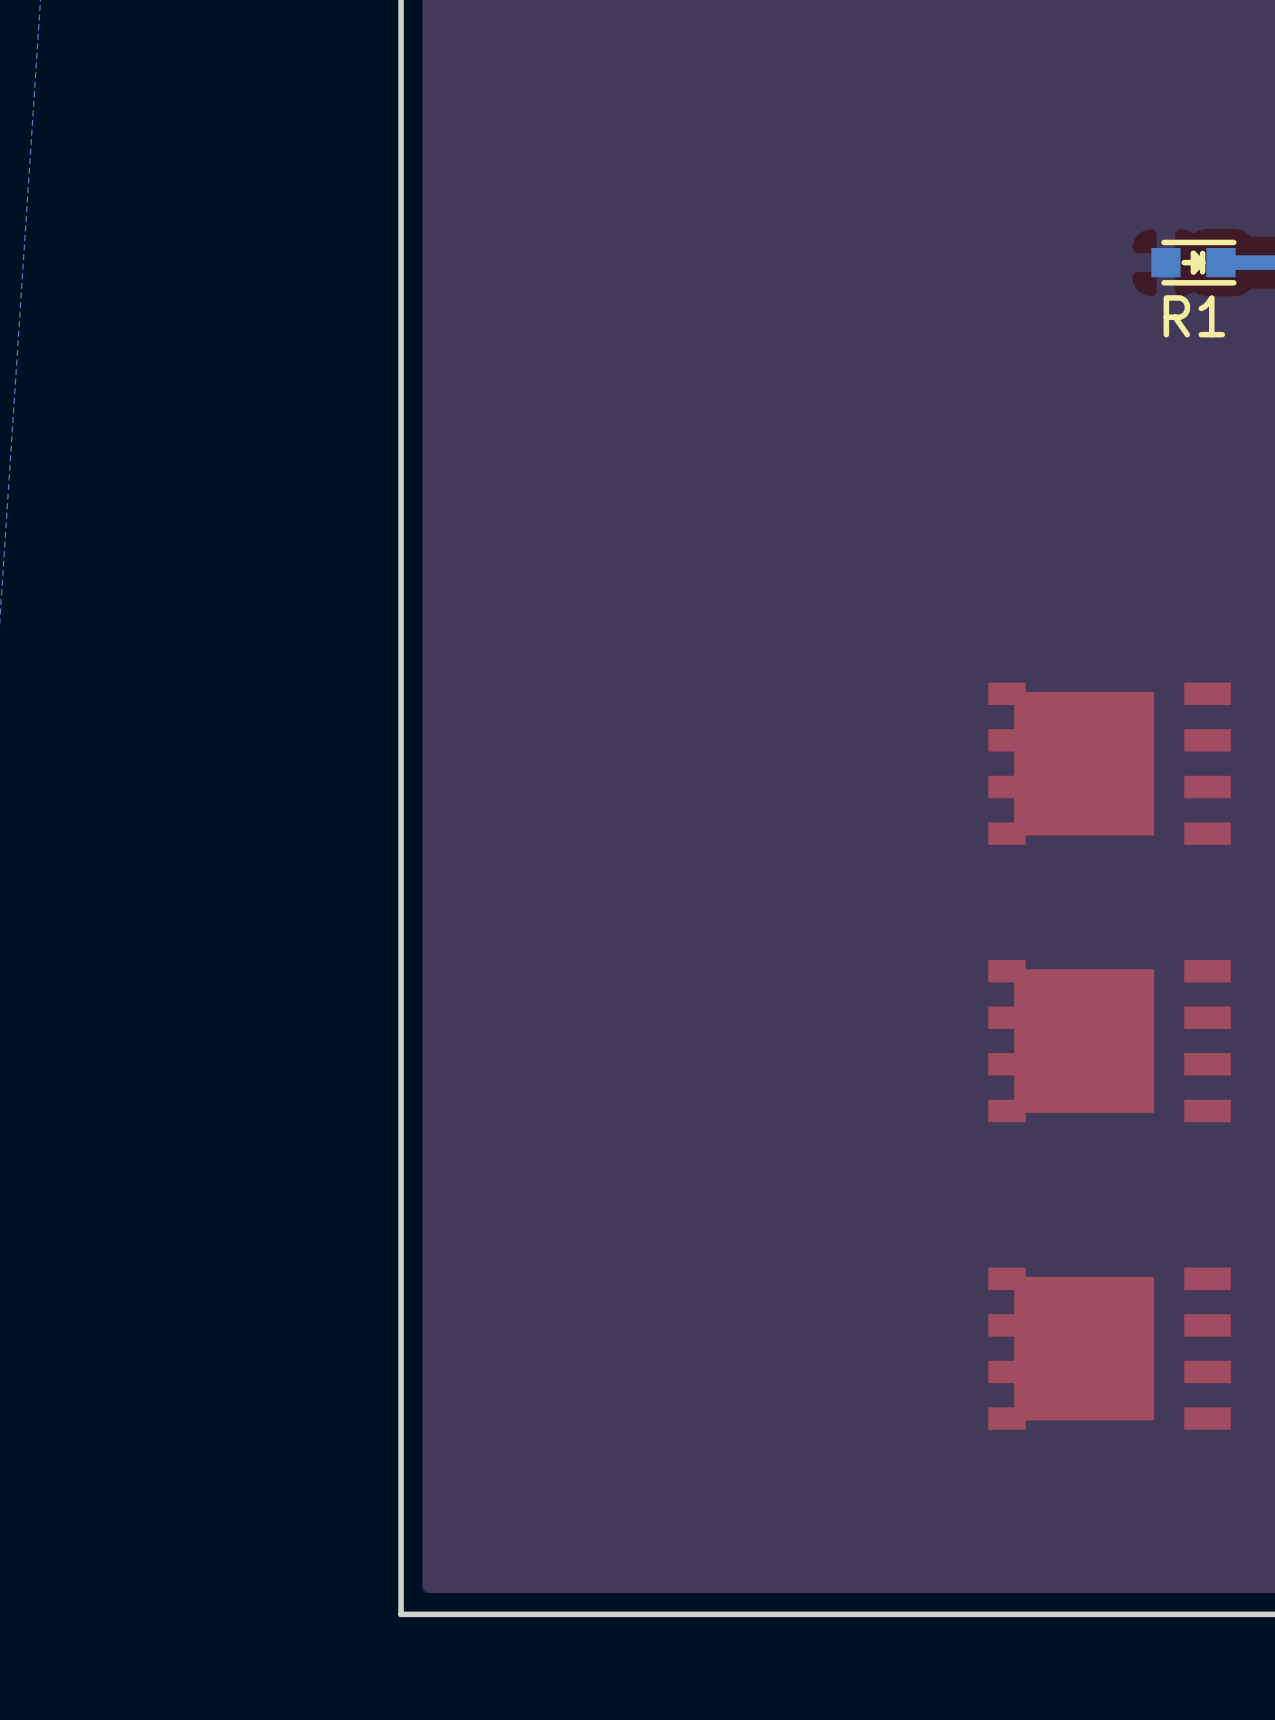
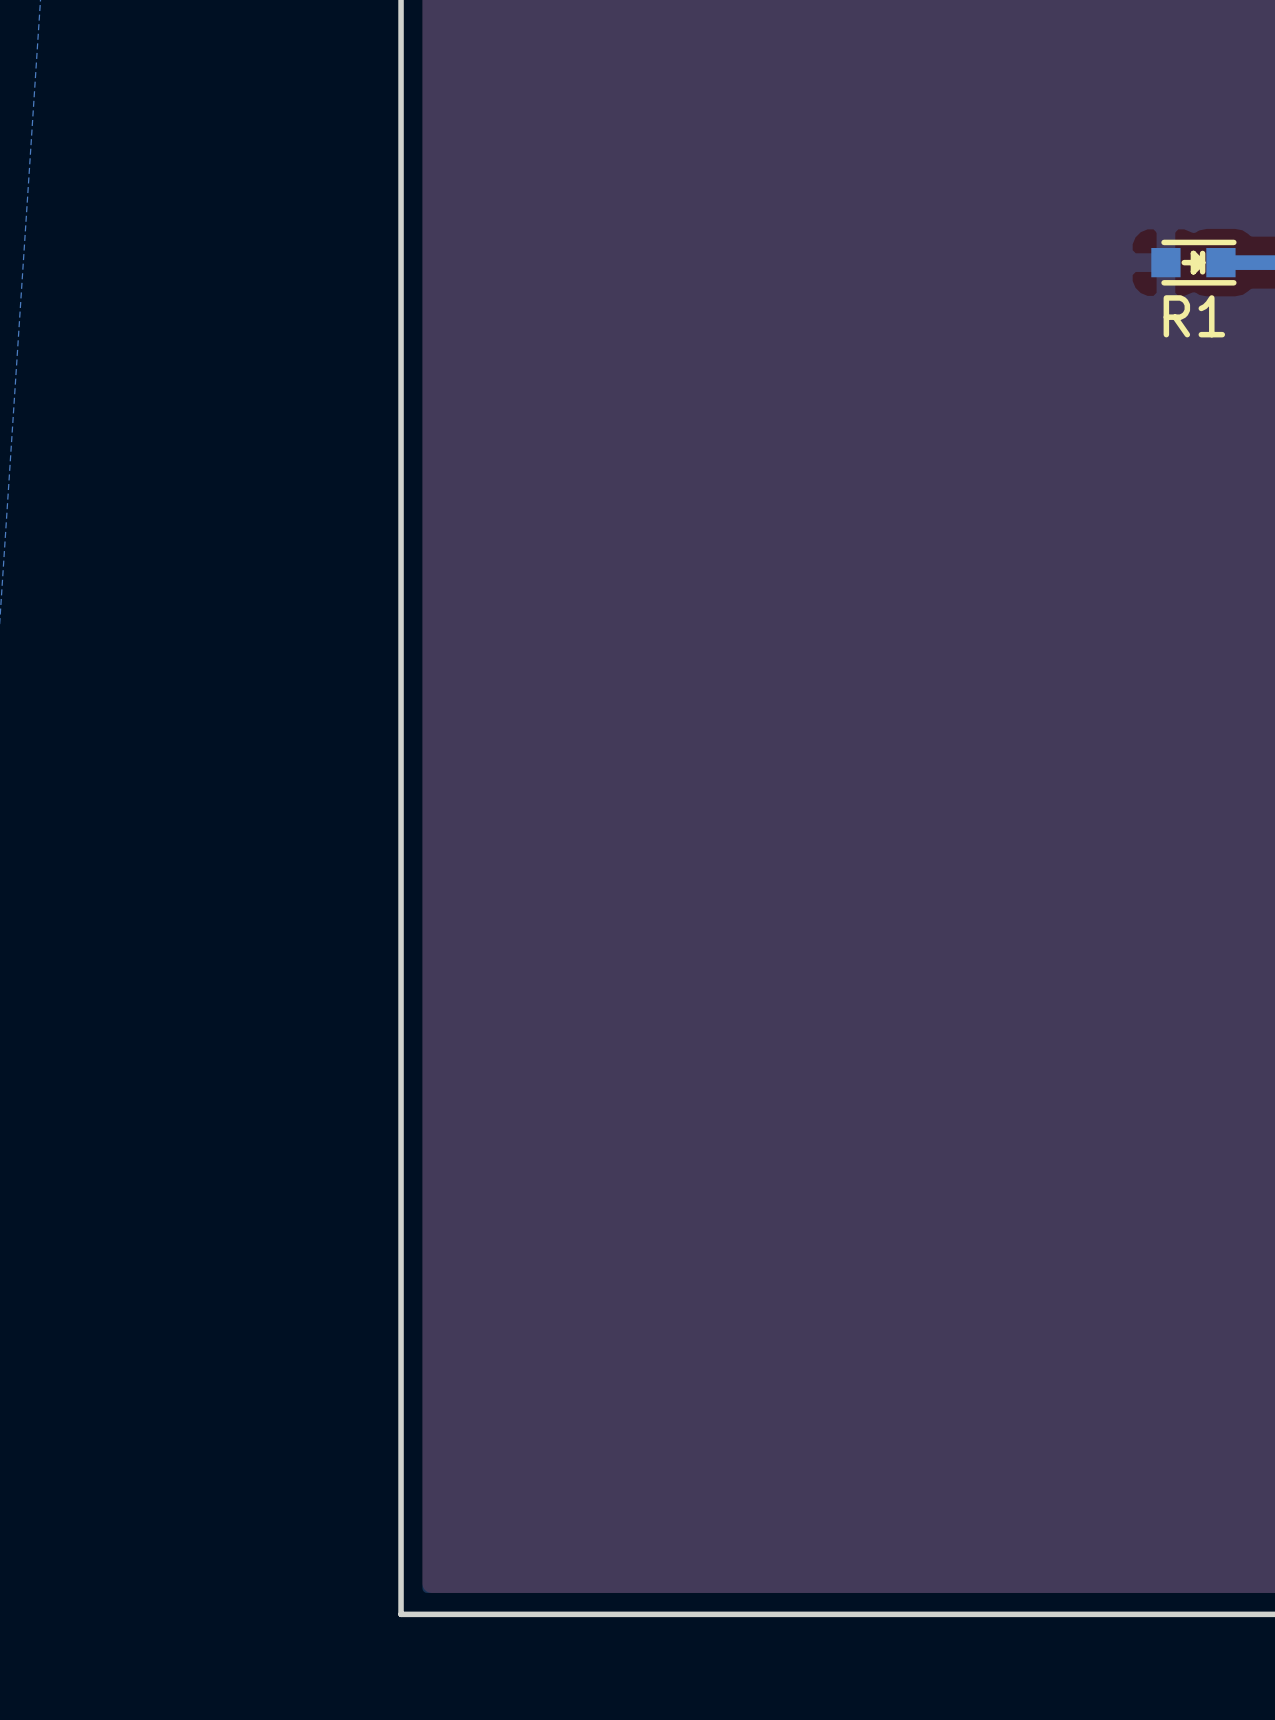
part: (1109, 763) -> none
part: (1109, 1041) -> none
part: (1109, 1348) -> none

